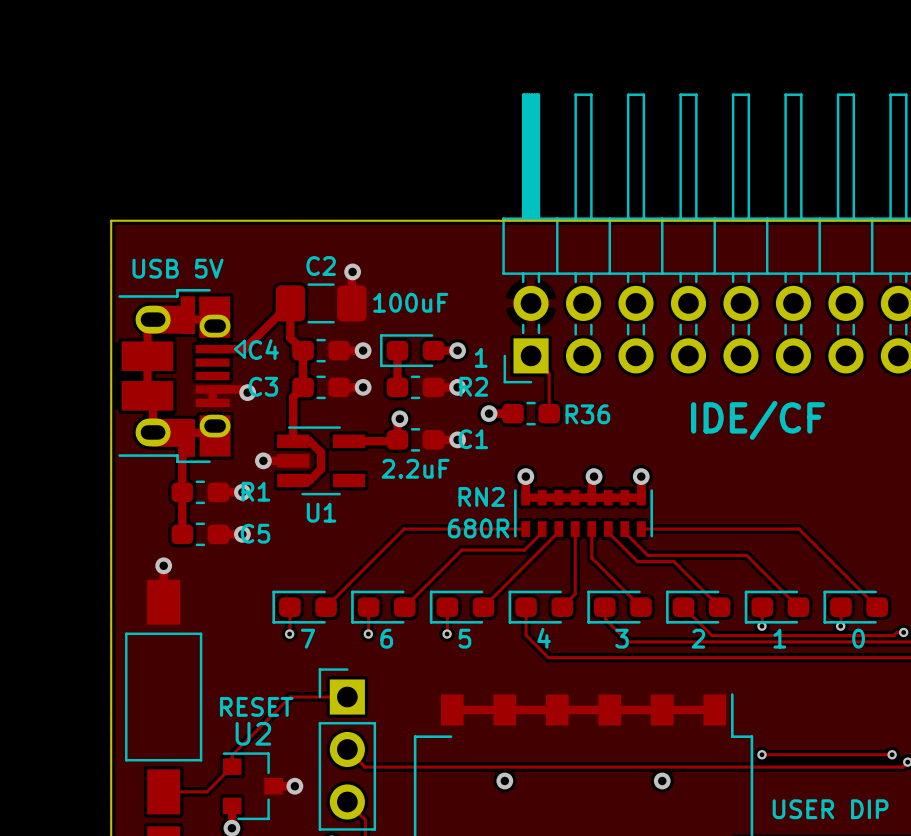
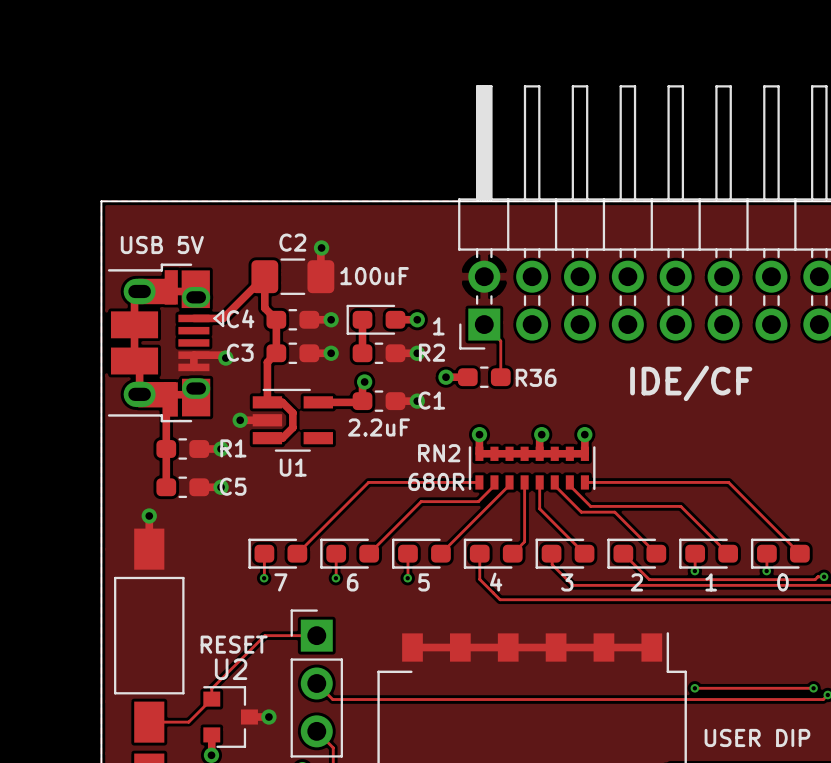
via: (504, 780) -> none
via: (662, 780) -> none

